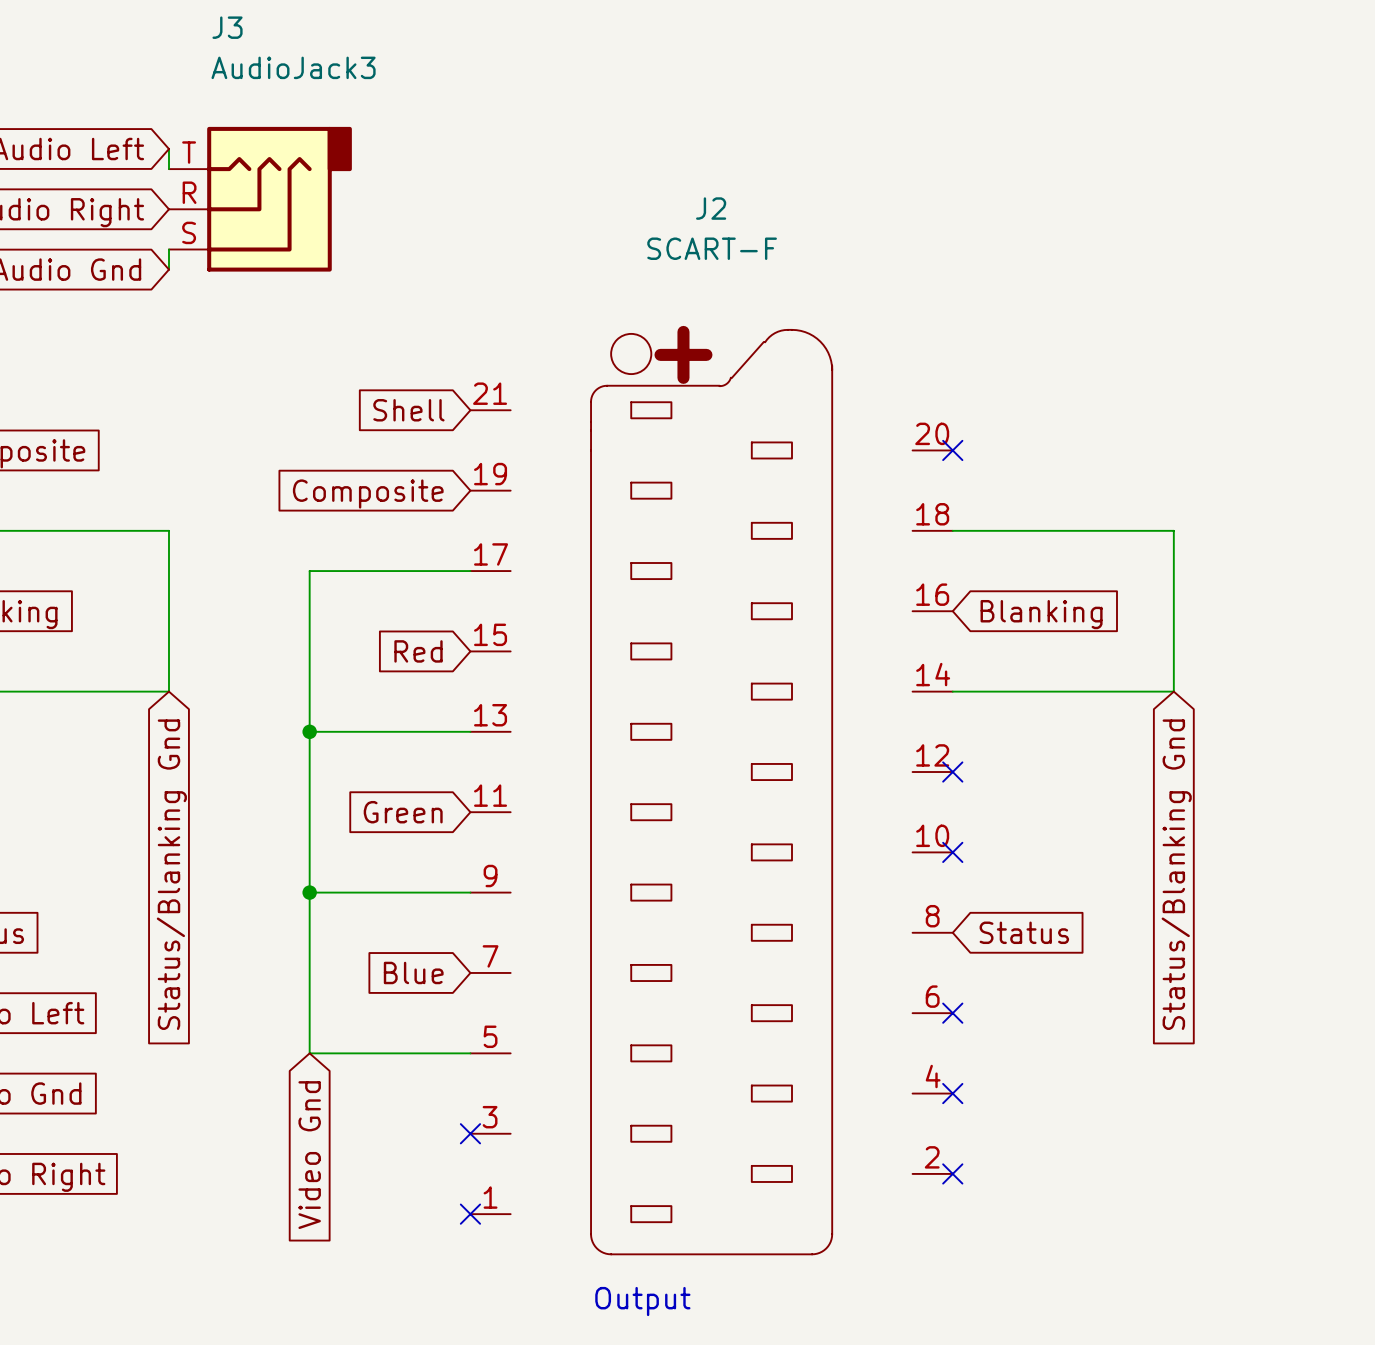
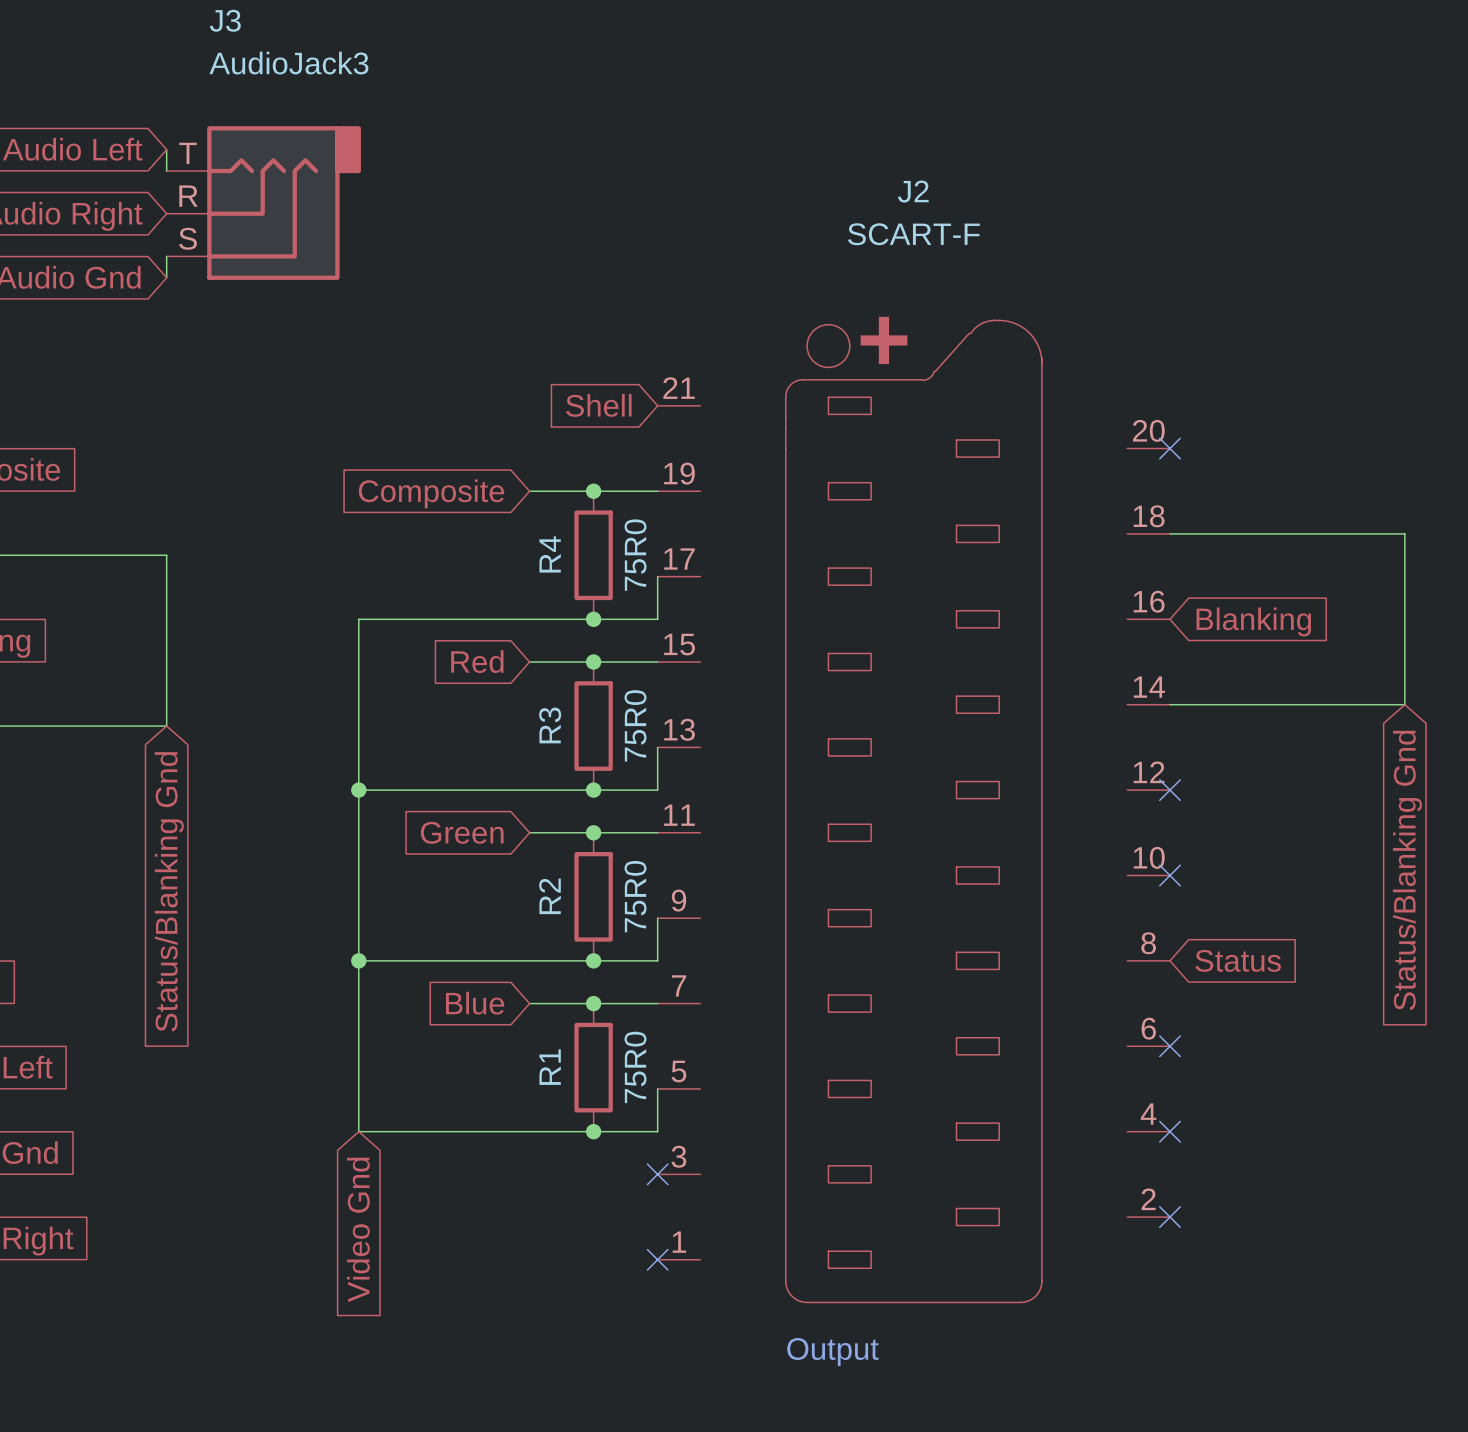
global label position: Shell (408, 410) -> Shell (598, 405)
no-connect mark: none -> (1170, 448)
no-connect mark: (952, 450) -> none
wire: none -> (529, 491) (657, 491)
junction: none -> (593, 491)
global label position: Composite (368, 494) -> Composite (431, 493)
R4: none -> 75R0 (593, 555)
wire: (952, 530) (1173, 530) (1173, 691) (952, 691) -> (1170, 533) (1404, 533) (1404, 704) (1170, 704)
wire: none -> (657, 576) (657, 619) (358, 619) (358, 1131) (657, 1131) (657, 1088)
wire: (470, 571) (309, 571) (309, 1053) (470, 1053) -> none
junction: none -> (593, 619)
global label position: Blanking (1041, 614) -> Blanking (1253, 621)
wire: none -> (529, 662) (657, 662)
junction: none -> (593, 662)
global label position: Red (418, 651) -> Red (477, 661)
R3: none -> 75R0 (593, 726)
wire: none -> (657, 747) (657, 790) (358, 790)
wire: (309, 731) (470, 731) -> none
junction position: (309, 731) -> (358, 790)
junction: none -> (593, 790)
no-connect mark: none -> (1170, 790)
no-connect mark: (952, 772) -> none
wire: none -> (529, 832) (657, 832)
junction: none -> (593, 832)
J2 position: (711, 792) -> (913, 811)
global label position: Green (403, 812) -> Green (462, 832)
no-connect mark: none -> (1170, 875)
R2: none -> 75R0 (593, 896)
no-connect mark: (952, 852) -> none
wire: none -> (657, 918) (657, 960) (358, 960)
global label position: Status/Blanking Gnd (1176, 874) -> Status/Blanking Gnd (1407, 870)
wire: (309, 892) (470, 892) -> none
junction position: (309, 892) -> (358, 960)
junction: none -> (593, 960)
global label position: Status (1024, 932) -> Status (1238, 960)
wire: none -> (529, 1003) (657, 1003)
junction: none -> (593, 1003)
global label position: Blue (413, 972) -> Blue (475, 1003)
no-connect mark: none -> (1170, 1046)
R1: none -> 75R0 (593, 1067)
no-connect mark: (952, 1013) -> none
junction: none -> (593, 1131)
no-connect mark: none -> (1170, 1131)
no-connect mark: (952, 1093) -> none
no-connect mark: none -> (657, 1174)
no-connect mark: (470, 1133) -> none
no-connect mark: none -> (1170, 1217)
global label position: Video Gnd (309, 1155) -> Video Gnd (358, 1229)
no-connect mark: (952, 1173) -> none
no-connect mark: none -> (657, 1259)
no-connect mark: (470, 1214) -> none
text position: Output (642, 1301) -> Output (832, 1352)

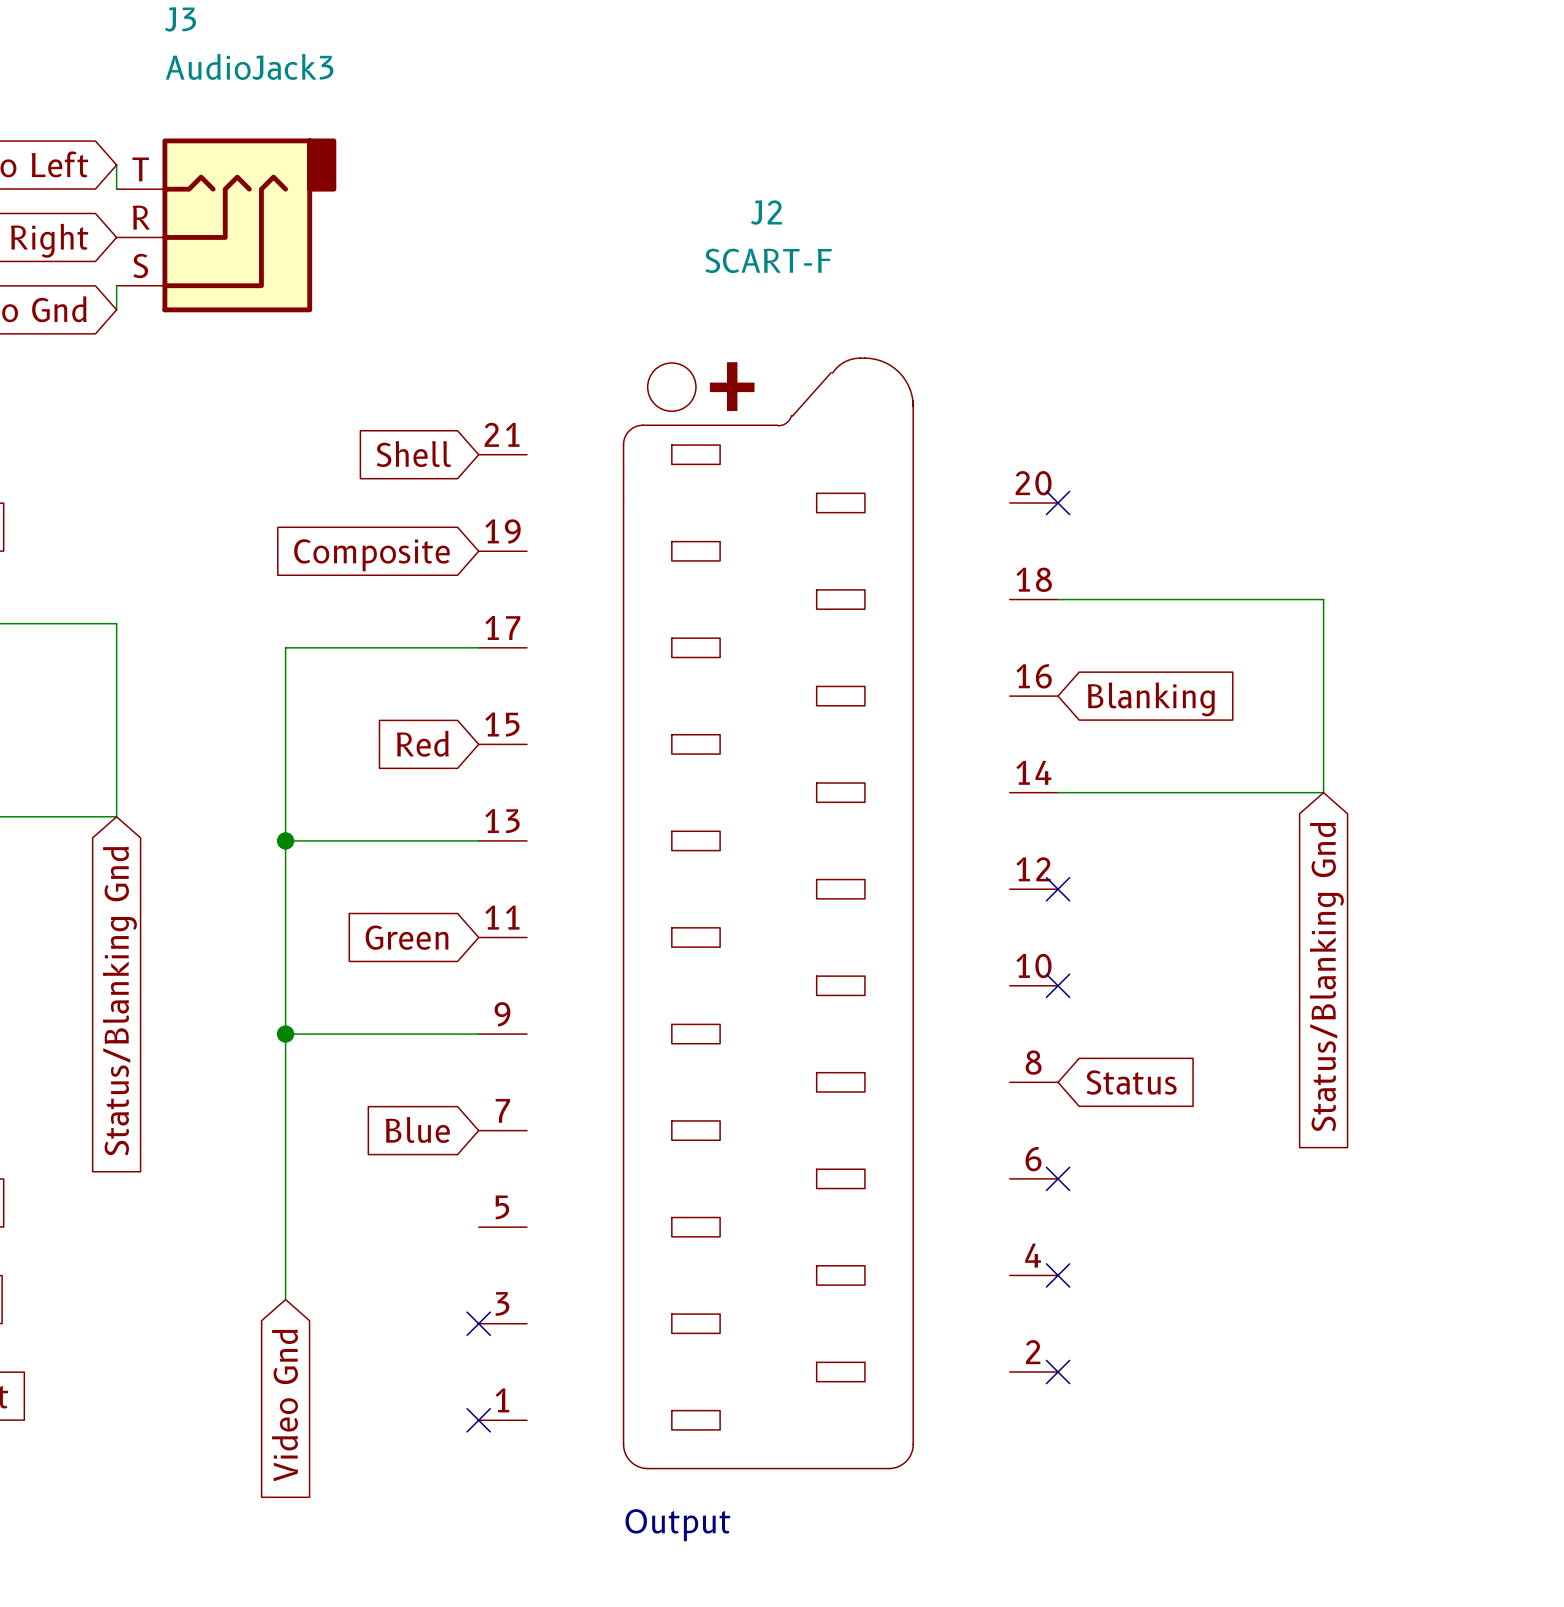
global label position: Shell (598, 405) -> Shell (413, 454)
no-connect mark: none -> (1058, 502)
no-connect mark: (1170, 448) -> none
wire: (529, 491) (657, 491) -> none
junction: (593, 491) -> none
global label position: Composite (431, 493) -> Composite (371, 555)
wire: none -> (1058, 599) (1251, 599)
wire: (1234, 533) (1404, 533) (1404, 704) (1234, 704) -> (1323, 599) (1323, 792)
R4: 75R0 (593, 555) -> none
wire: none -> (478, 647) (285, 647) (285, 1299)
wire: (657, 576) (657, 619) (358, 619) (358, 1131) (657, 1131) (657, 1088) -> none
junction: (593, 619) -> none
global label position: Blanking (1253, 621) -> Blanking (1151, 699)
global label position: Red (477, 661) -> Red (422, 743)
wire: (529, 662) (657, 662) -> none
junction: (593, 662) -> none
wire: none -> (1058, 792) (1251, 792)
R3: 75R0 (593, 726) -> none
wire: none -> (285, 840) (478, 840)
wire: (657, 747) (657, 790) (358, 790) -> none
junction position: (358, 790) -> (285, 840)
junction: (593, 790) -> none
no-connect mark: none -> (1058, 889)
no-connect mark: (1170, 790) -> none
J2 position: (913, 811) -> (768, 913)
global label position: Green (462, 832) -> Green (406, 937)
wire: (529, 832) (657, 832) -> none
junction: (593, 832) -> none
global label position: Status/Blanking Gnd (1407, 870) -> Status/Blanking Gnd (1326, 977)
no-connect mark: none -> (1058, 985)
no-connect mark: (1170, 875) -> none
R2: 75R0 (593, 896) -> none
wire: none -> (285, 1034) (478, 1034)
wire: (657, 918) (657, 960) (358, 960) -> none
junction position: (358, 960) -> (285, 1034)
junction: (593, 960) -> none
global label position: Status (1238, 960) -> Status (1131, 1082)
global label position: Blue (475, 1003) -> Blue (417, 1129)
wire: (529, 1003) (657, 1003) -> none
junction: (593, 1003) -> none
no-connect mark: none -> (1058, 1178)
no-connect mark: (1170, 1046) -> none
R1: 75R0 (593, 1067) -> none
junction: (593, 1131) -> none
no-connect mark: none -> (1058, 1275)
no-connect mark: (1170, 1131) -> none
no-connect mark: none -> (478, 1323)
no-connect mark: (657, 1174) -> none
no-connect mark: none -> (1058, 1372)
no-connect mark: (1170, 1217) -> none
global label position: Video Gnd (358, 1229) -> Video Gnd (284, 1405)
no-connect mark: none -> (478, 1420)
no-connect mark: (657, 1259) -> none
text position: Output (832, 1352) -> Output (677, 1525)

